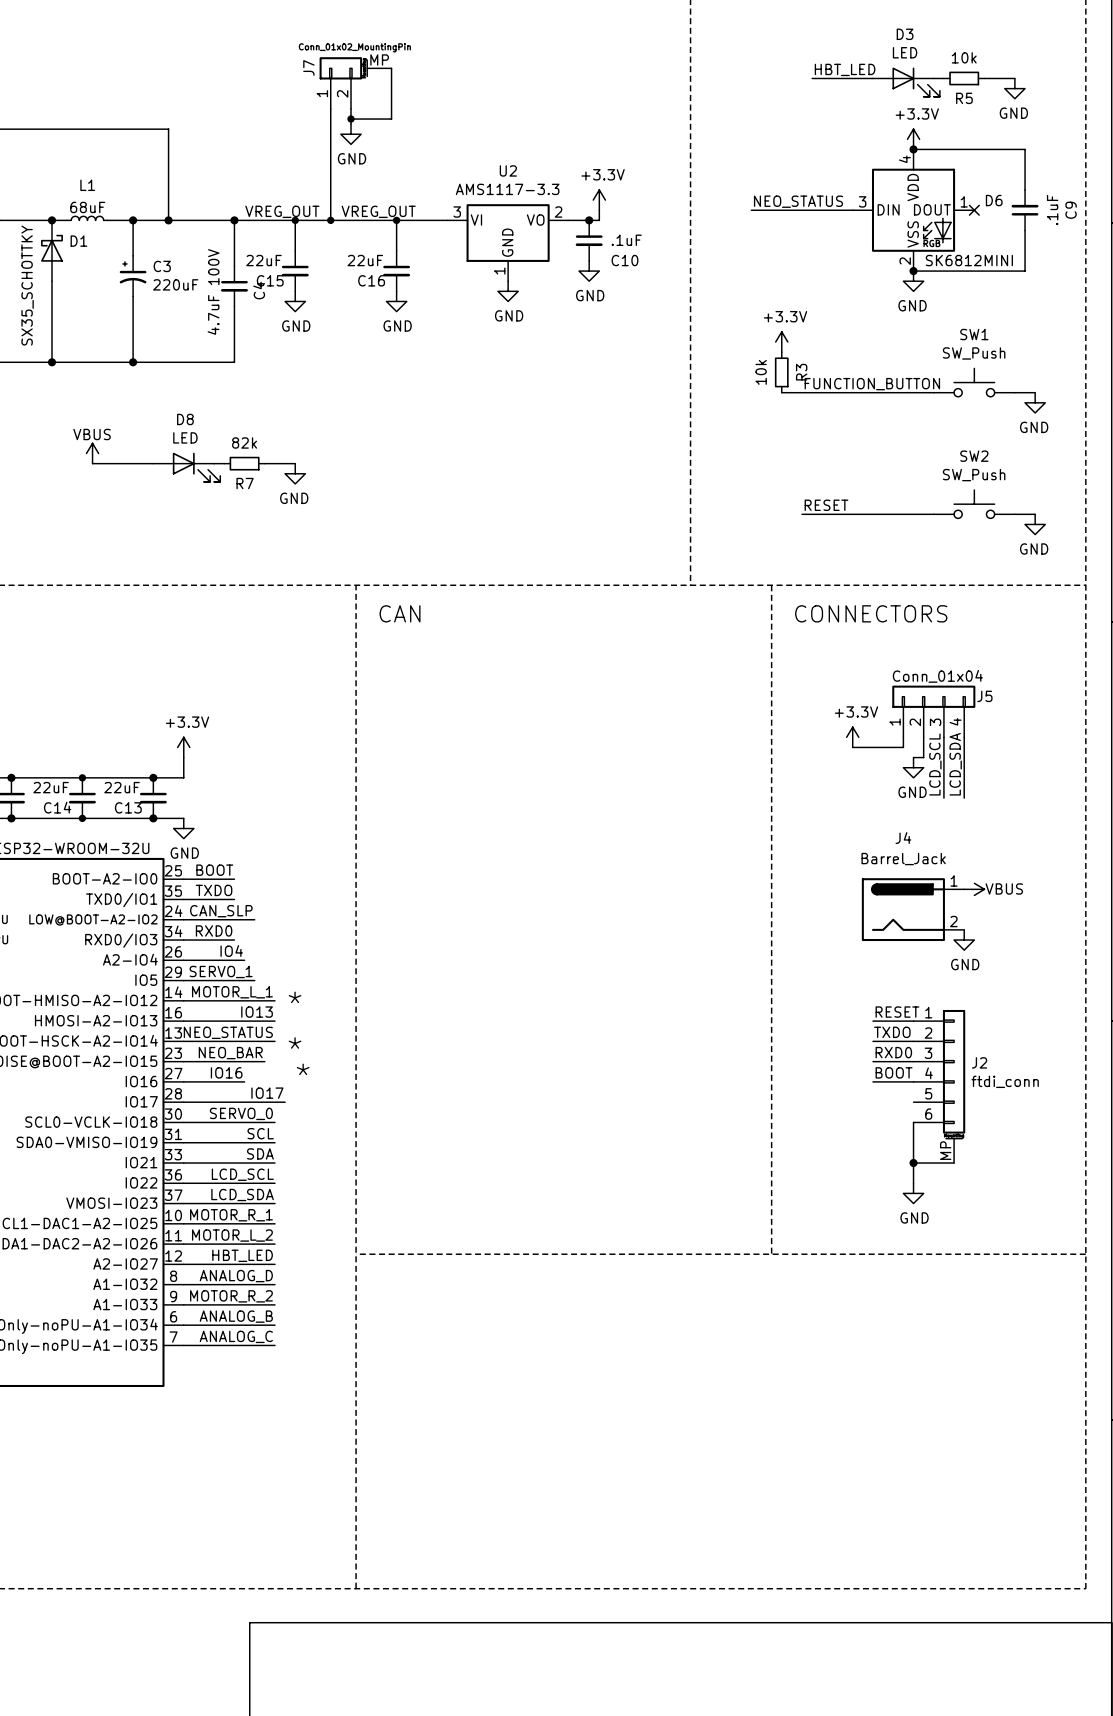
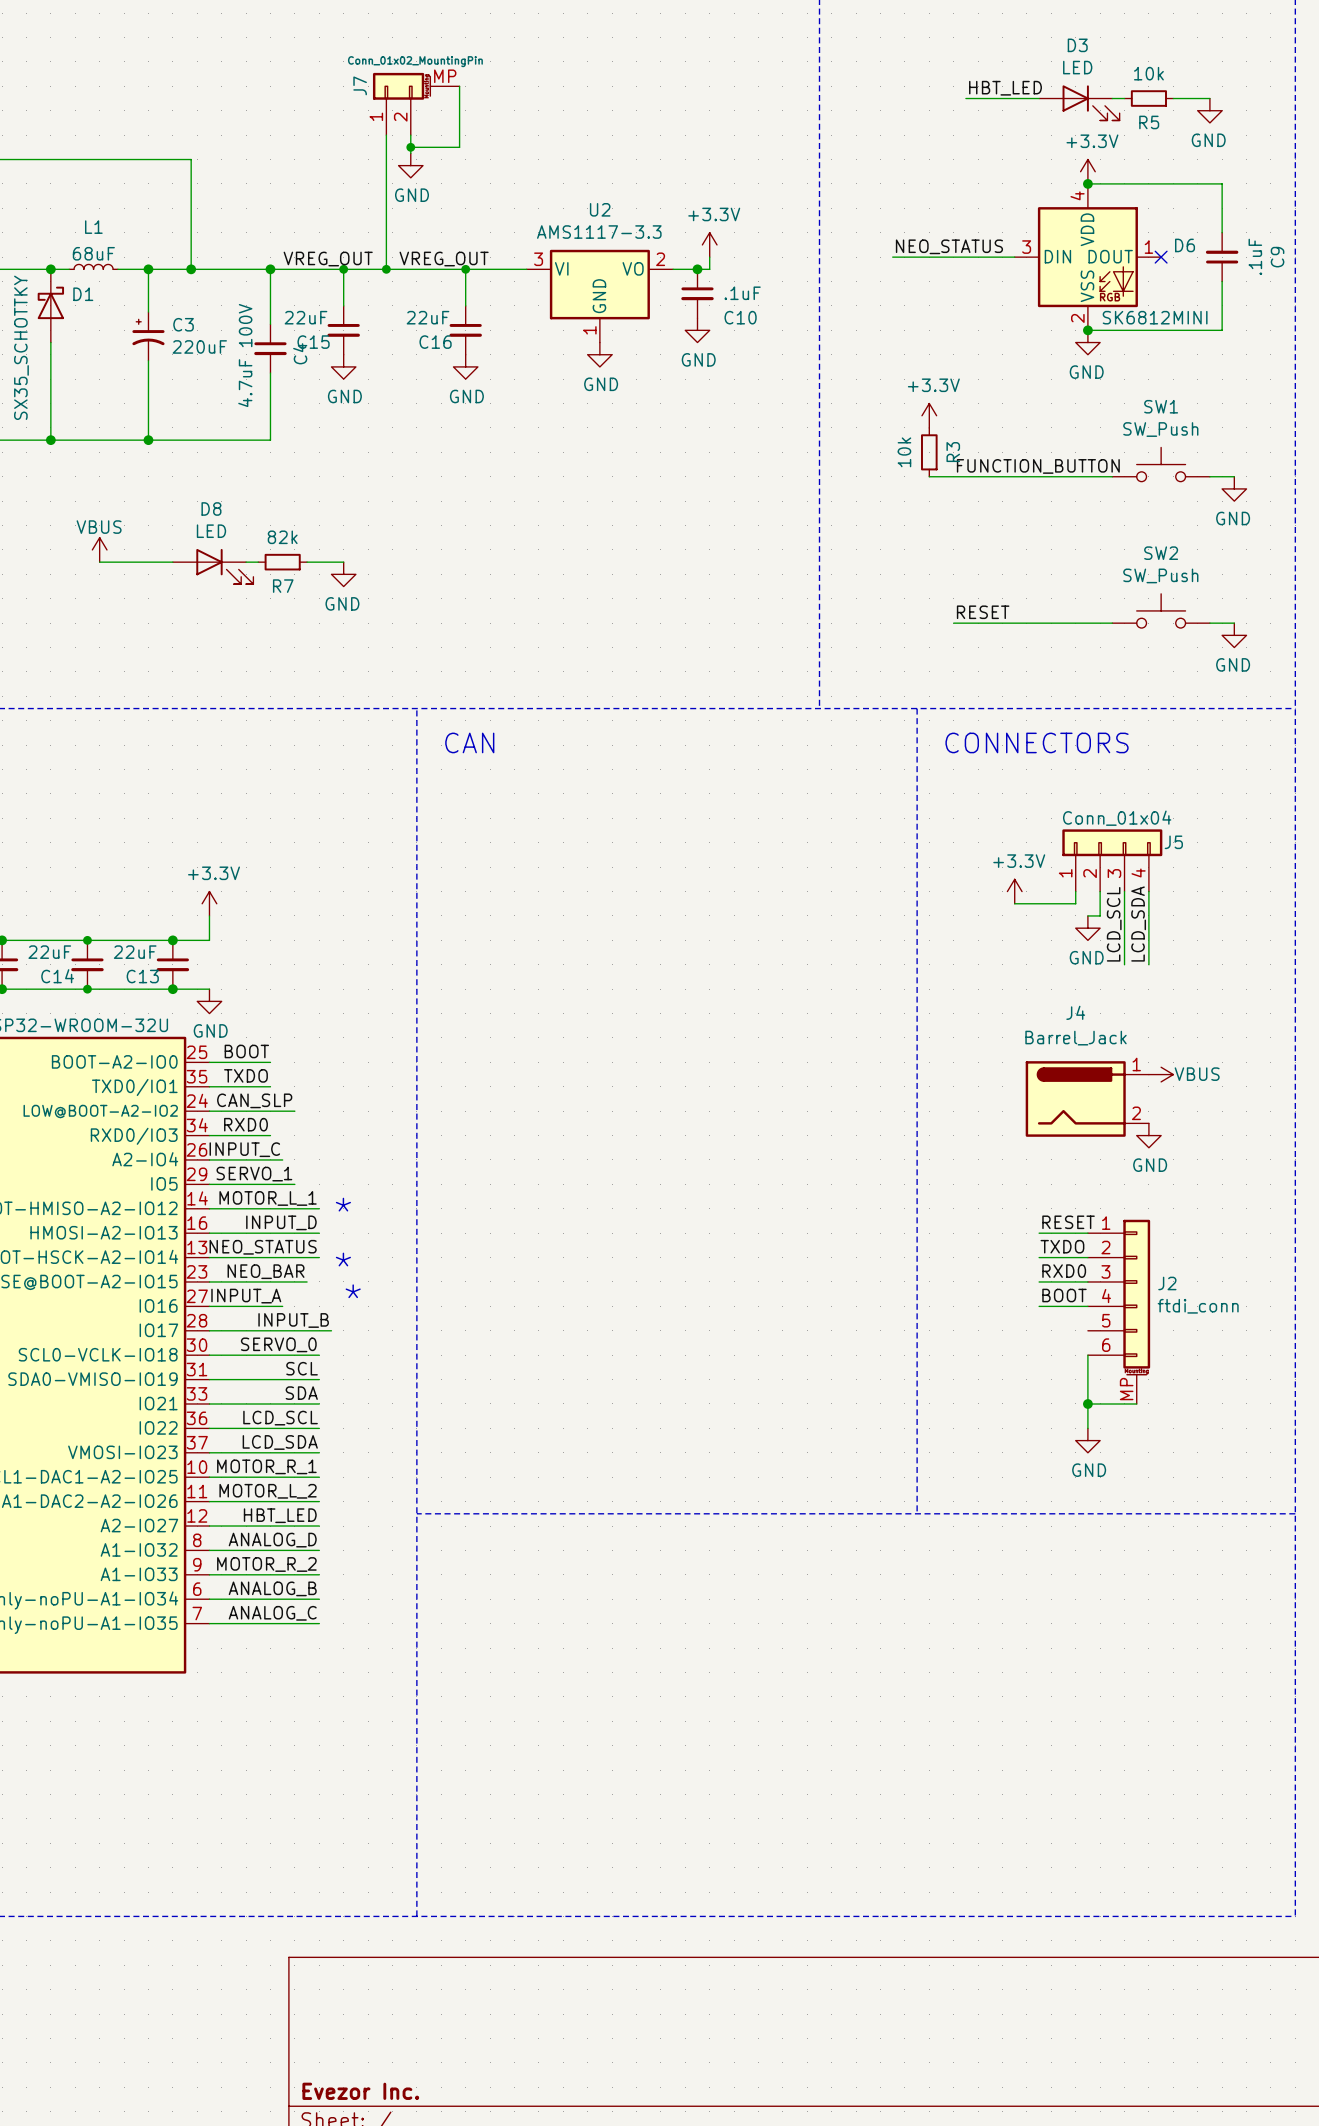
label: IO4 (231, 951) -> INPUT_C (244, 1149)
label: IO13 (257, 1012) -> INPUT_D (281, 1222)
label: IO16 (226, 1072) -> INPUT_A (246, 1296)
label: IO17 (267, 1093) -> INPUT_B (293, 1320)

